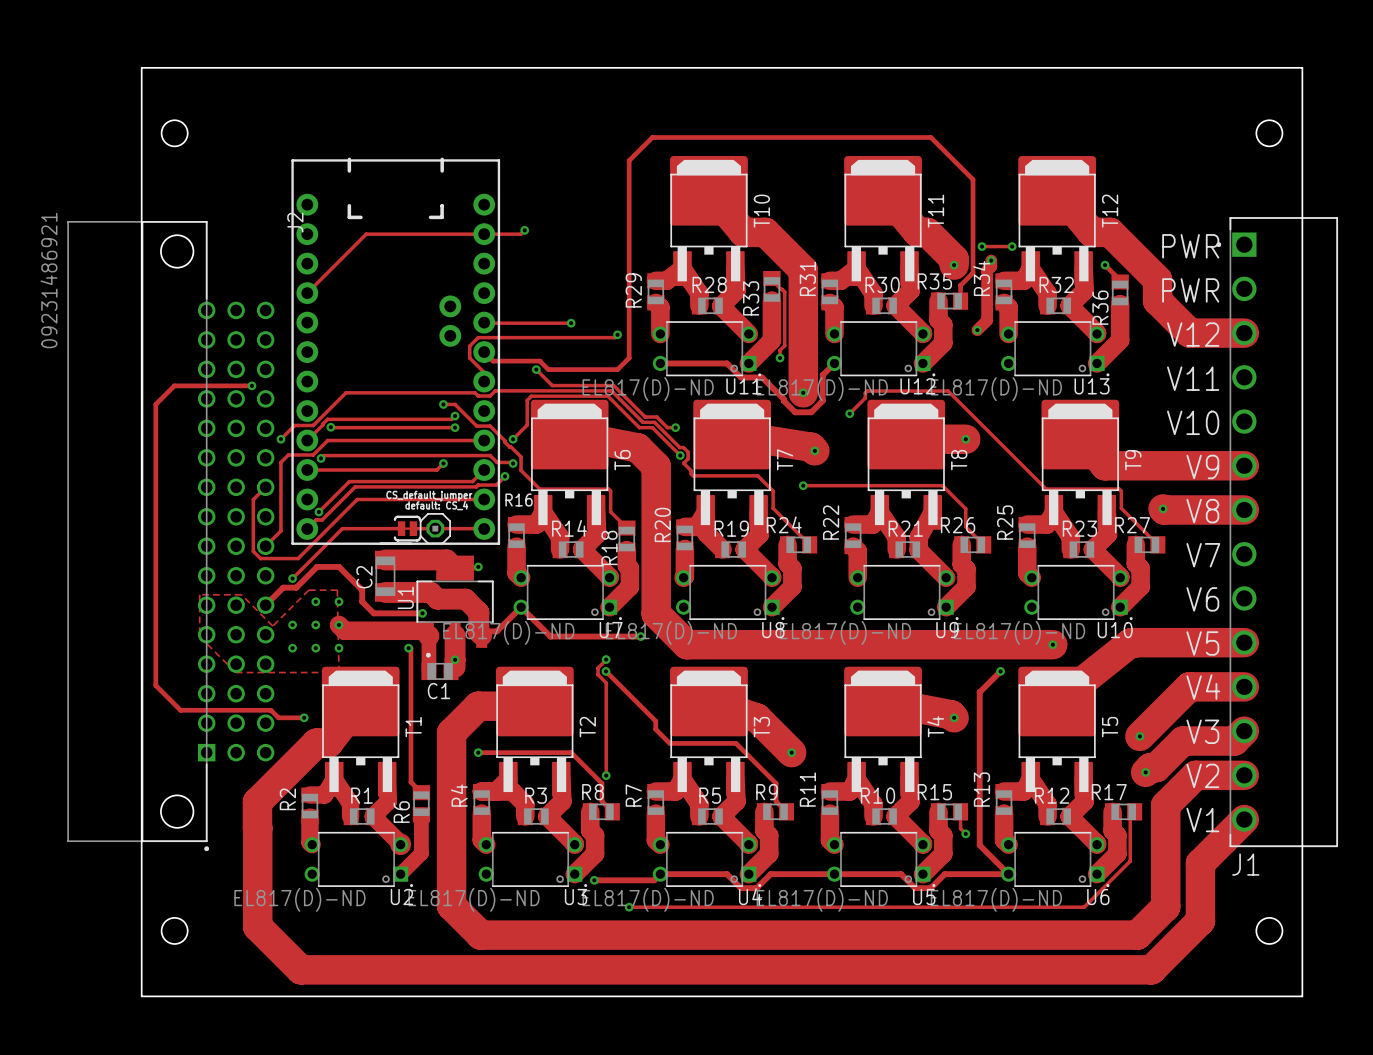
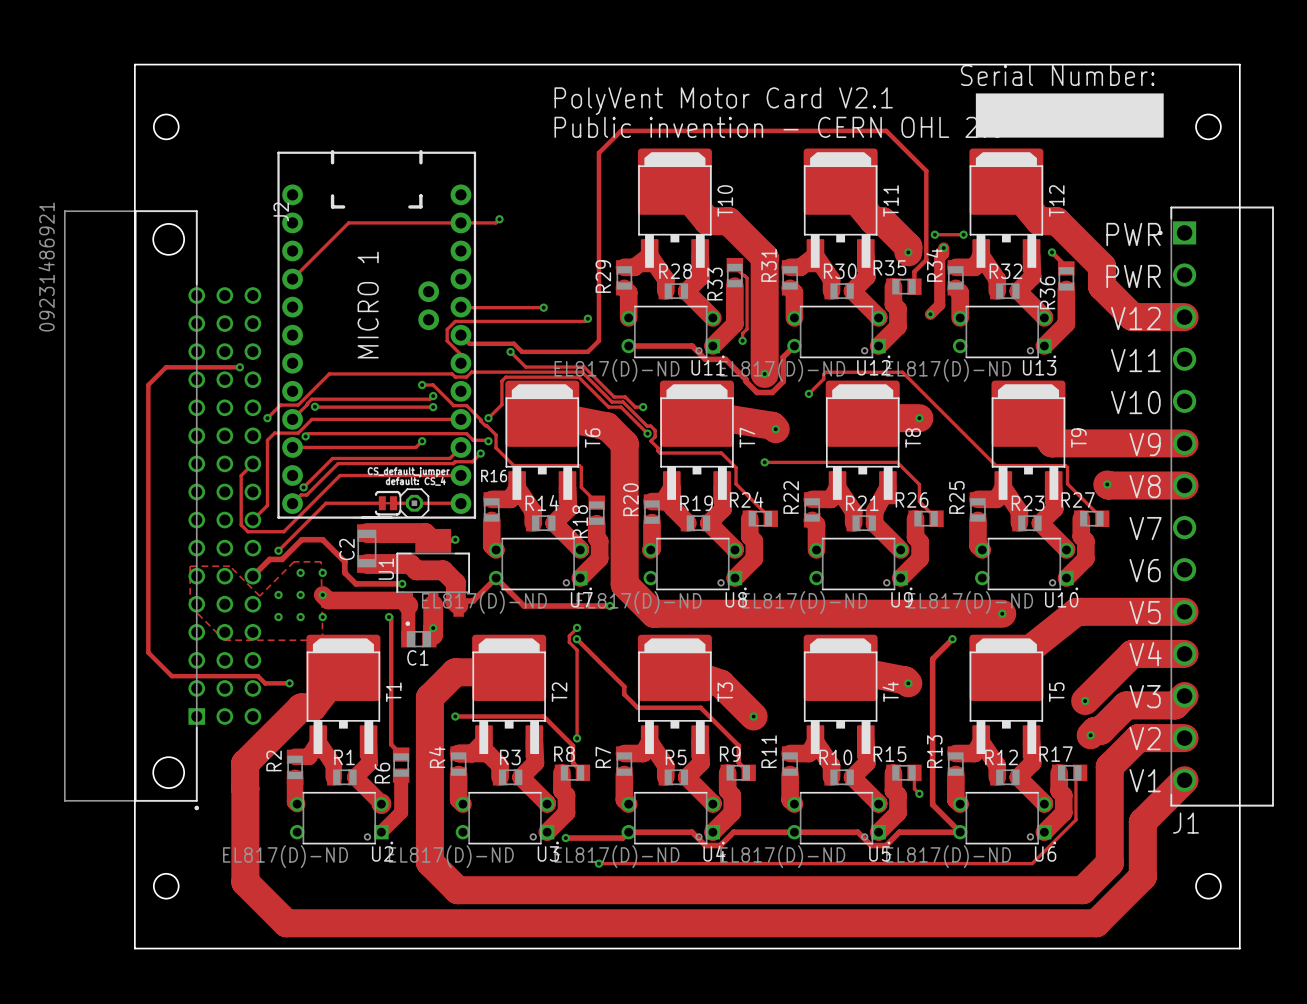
text: none -> Serial Number: (1057, 75)
drawing: none -> [975, 93, 1164, 138]
text: none -> PolyVent Motor Card V2.1 (723, 101)
text: none -> Public invention - CERN OHL 2.0 (778, 127)
text: none -> MICRO 1 (368, 305)

